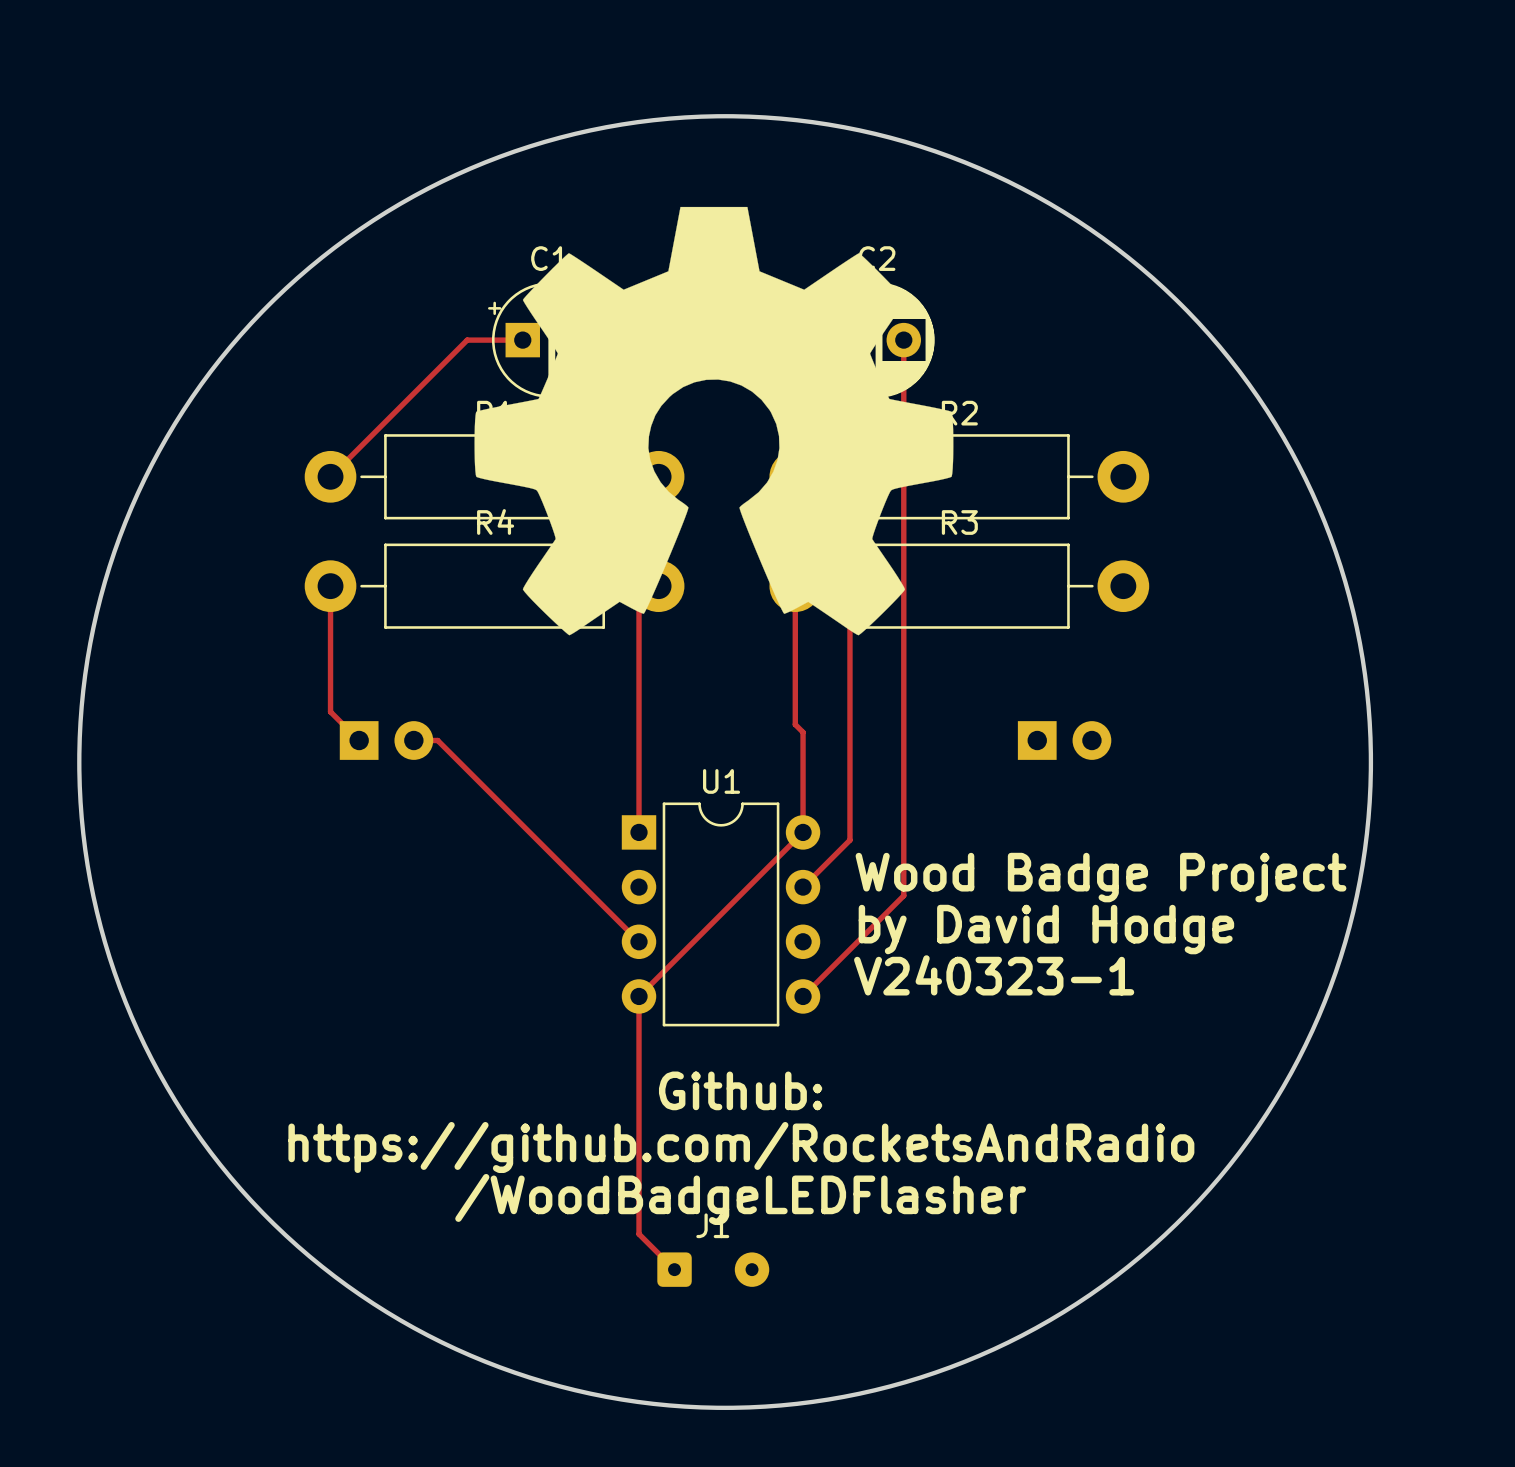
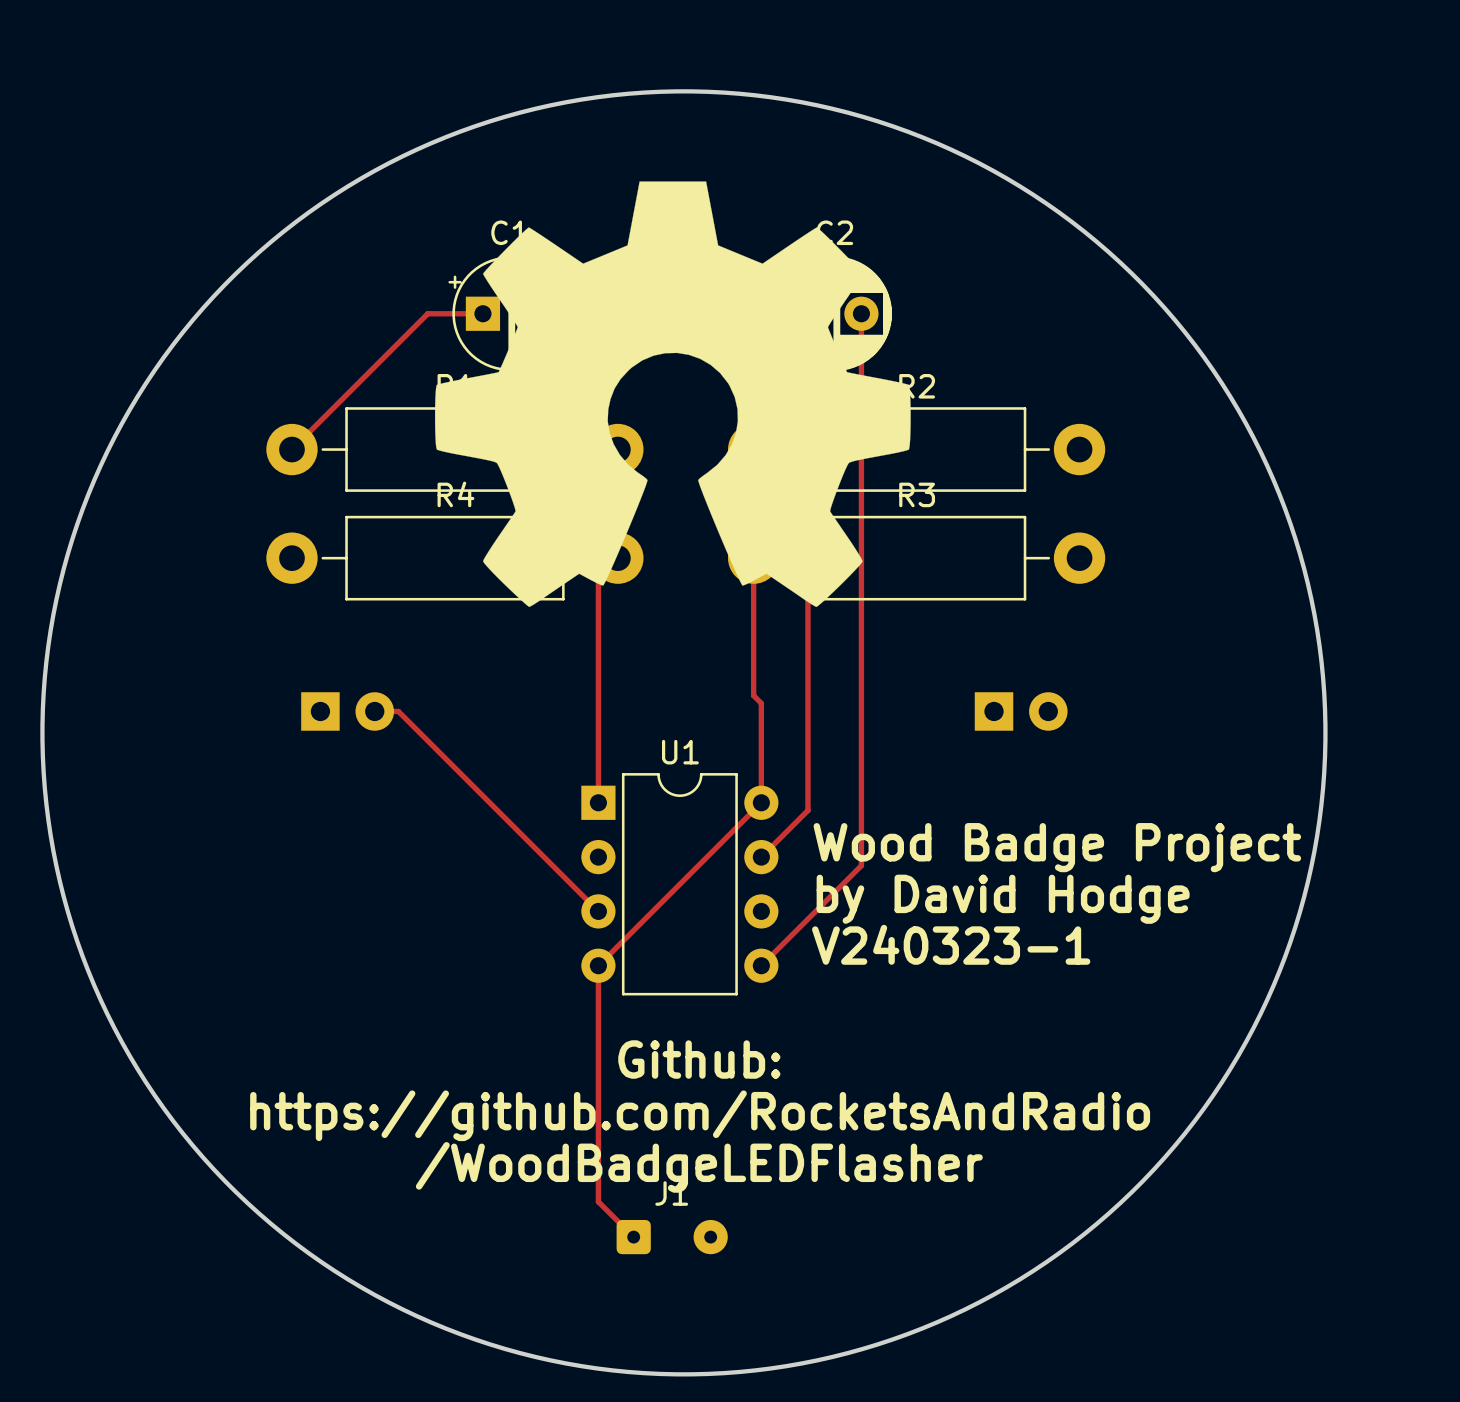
track: (330, 586) (330, 711) (359, 740) -> none

